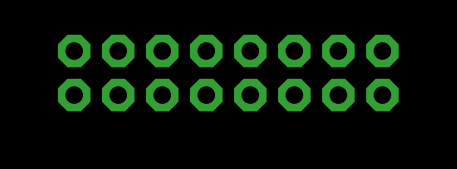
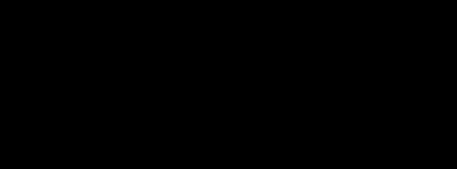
part: (228, 73) -> none

